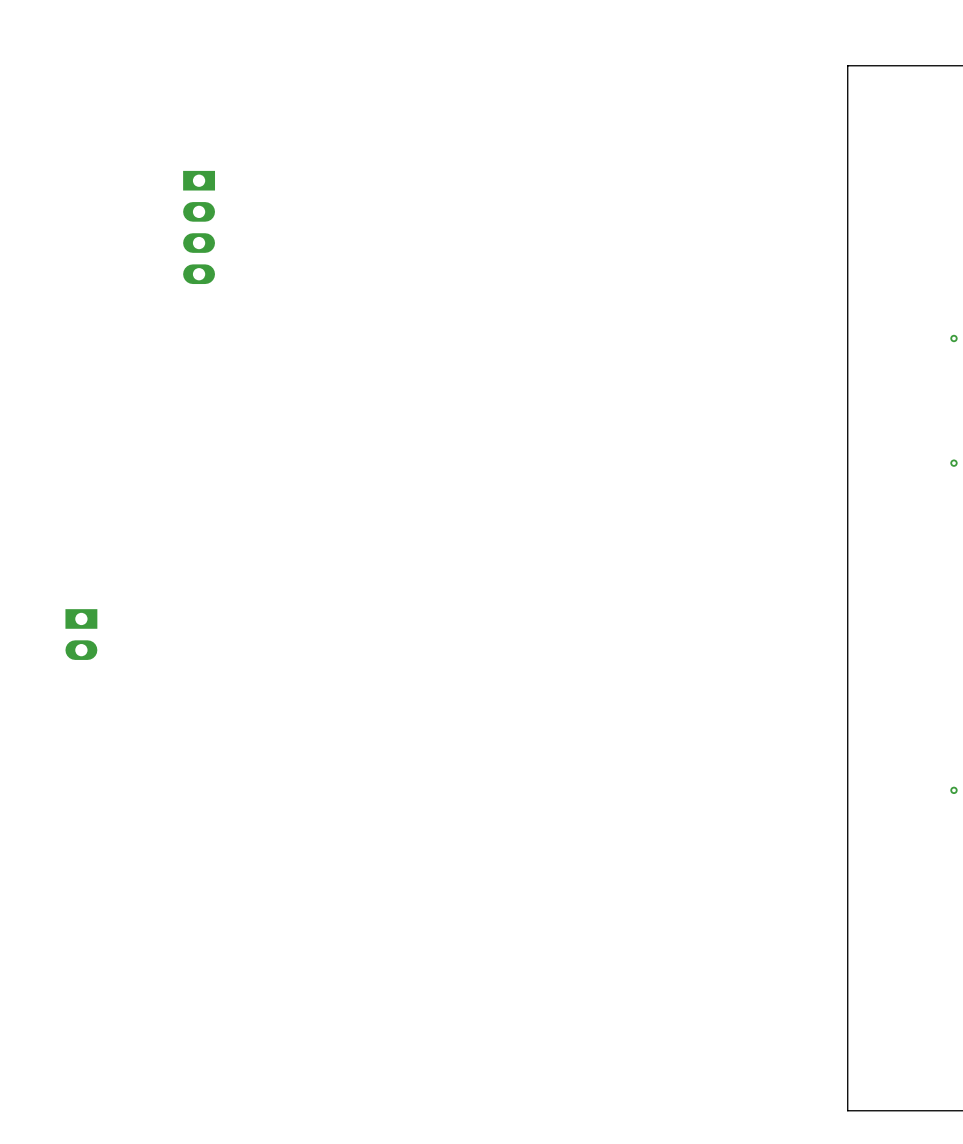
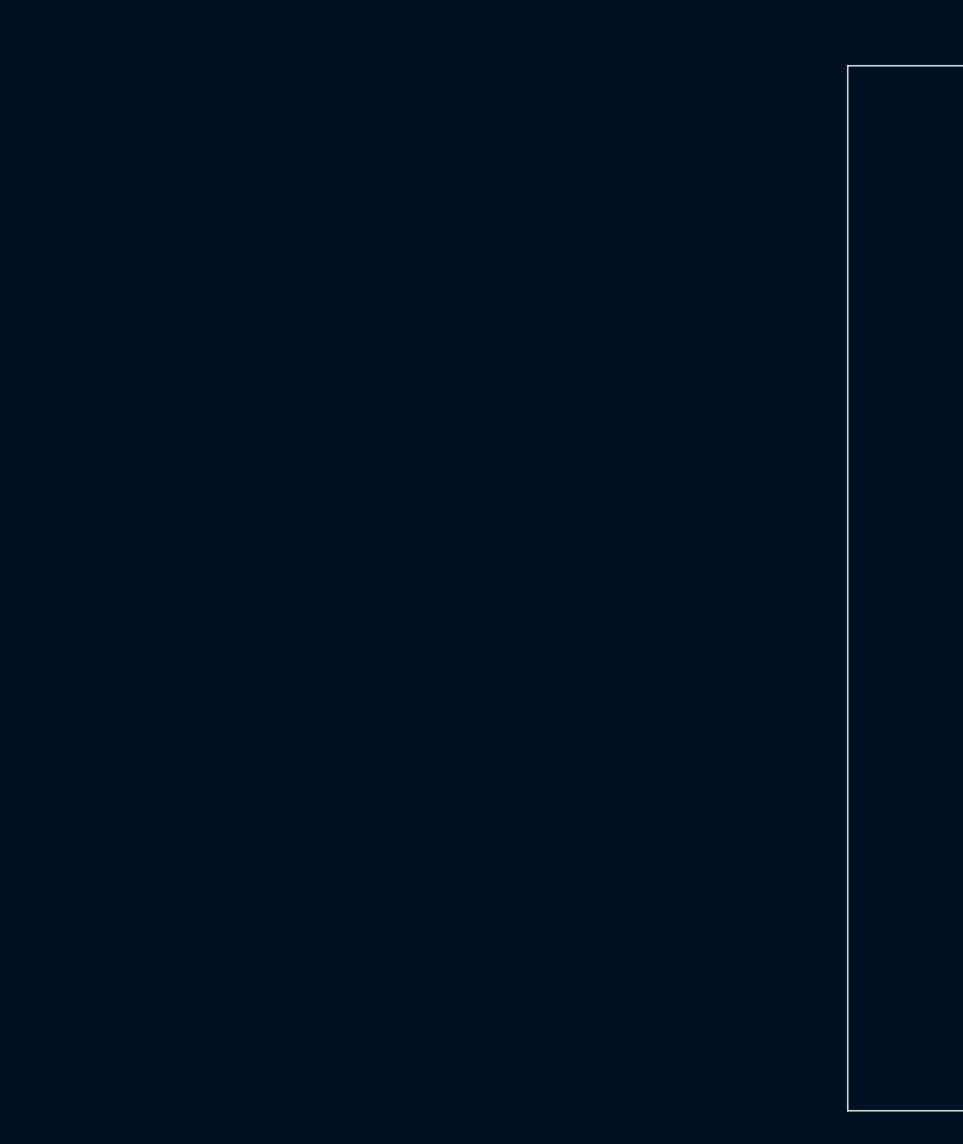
part: (199, 227) -> none
via: (953, 338) -> none
via: (953, 463) -> none
part: (81, 634) -> none
via: (953, 790) -> none

